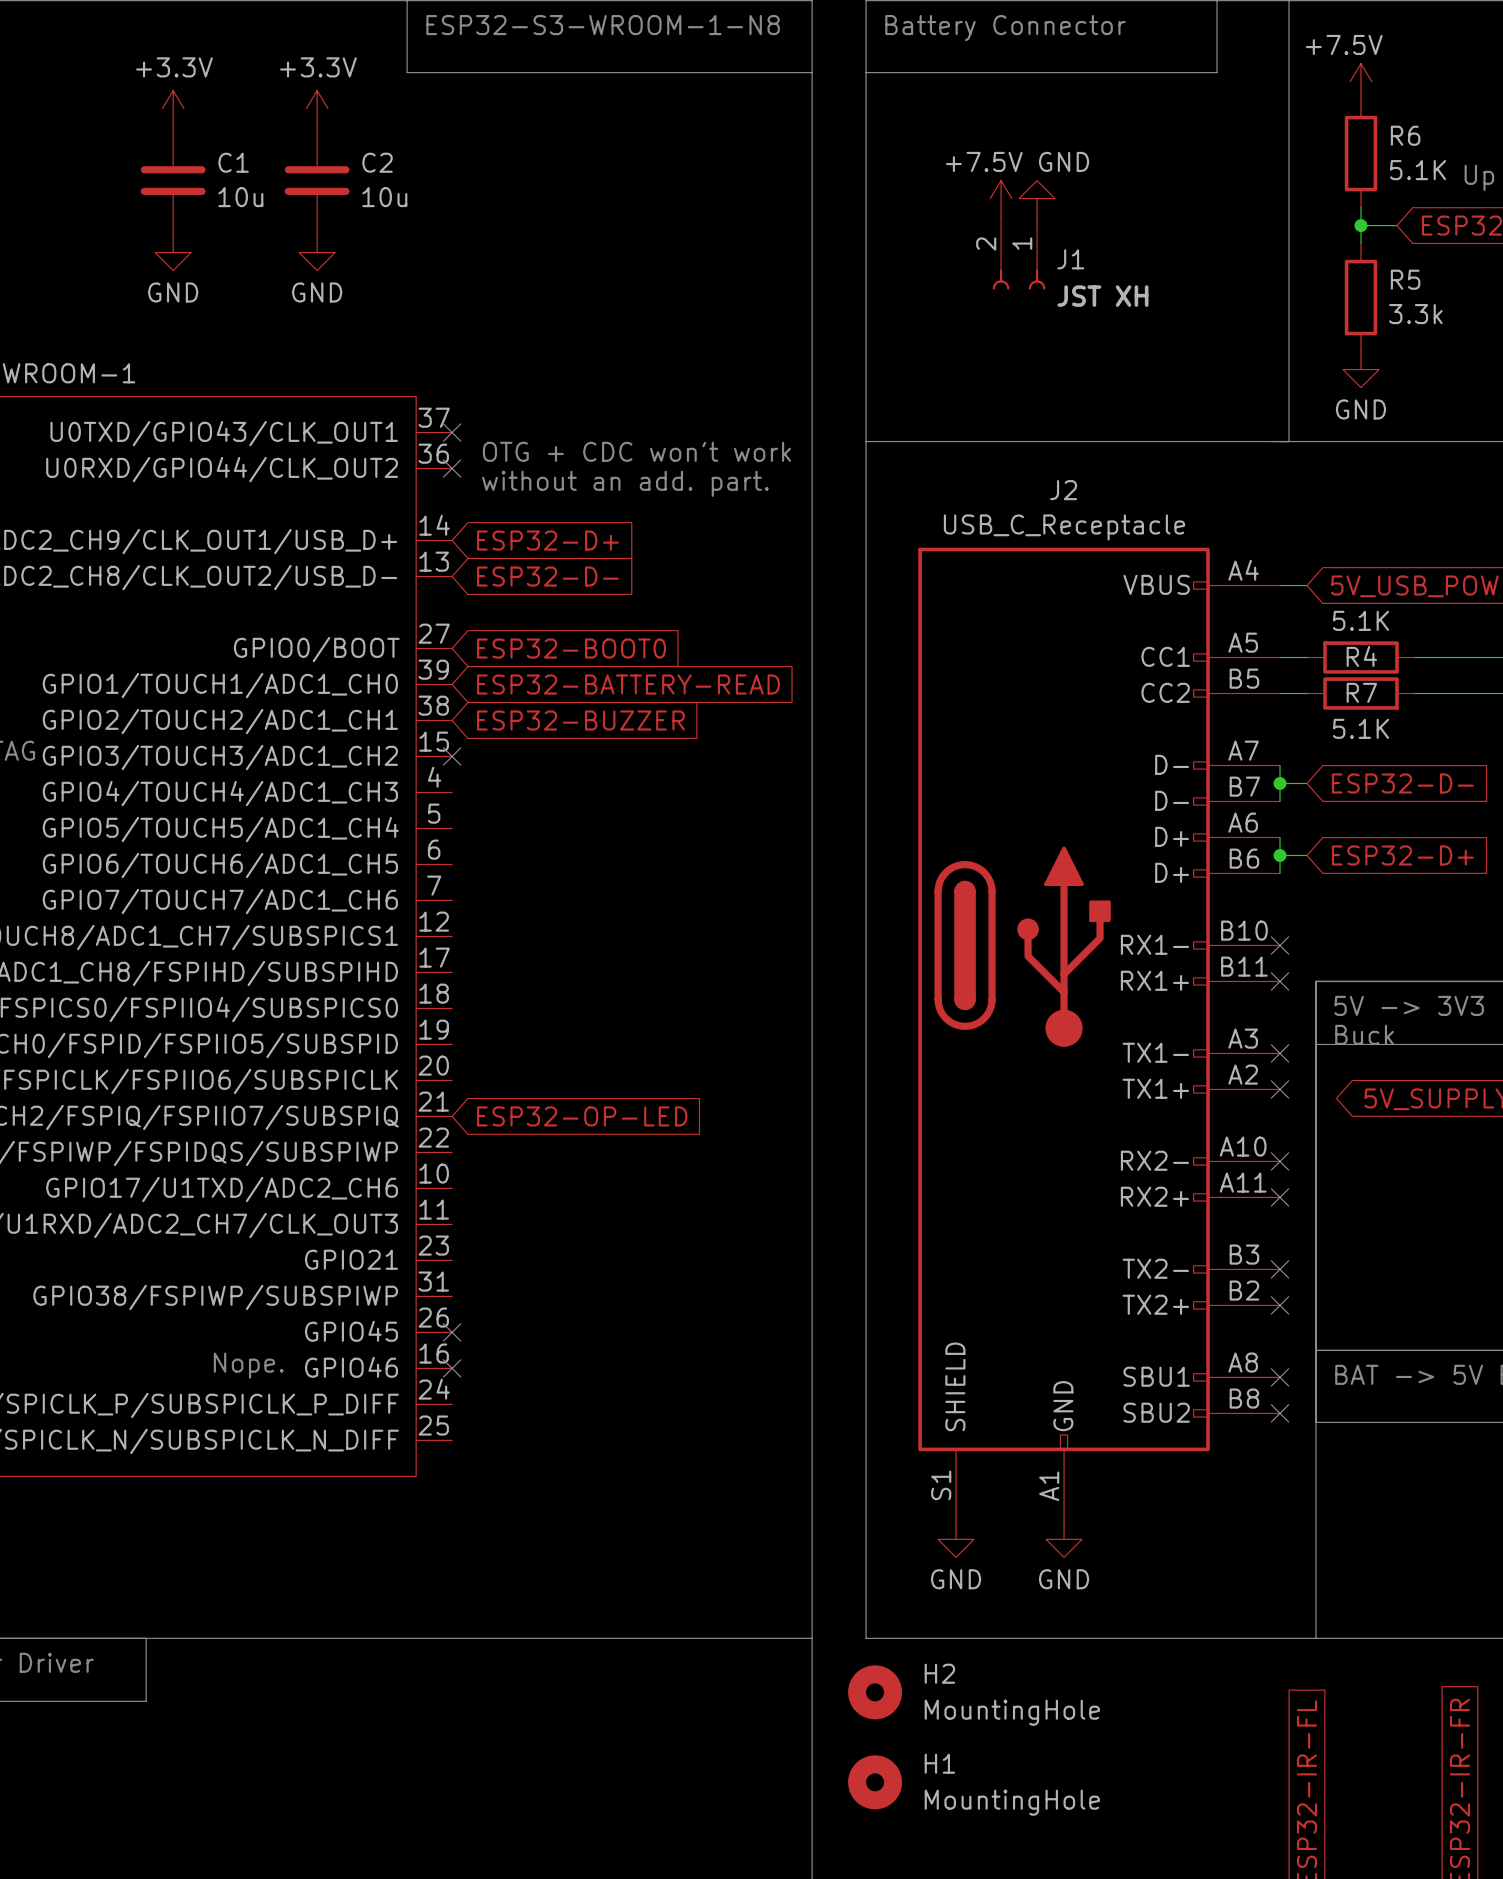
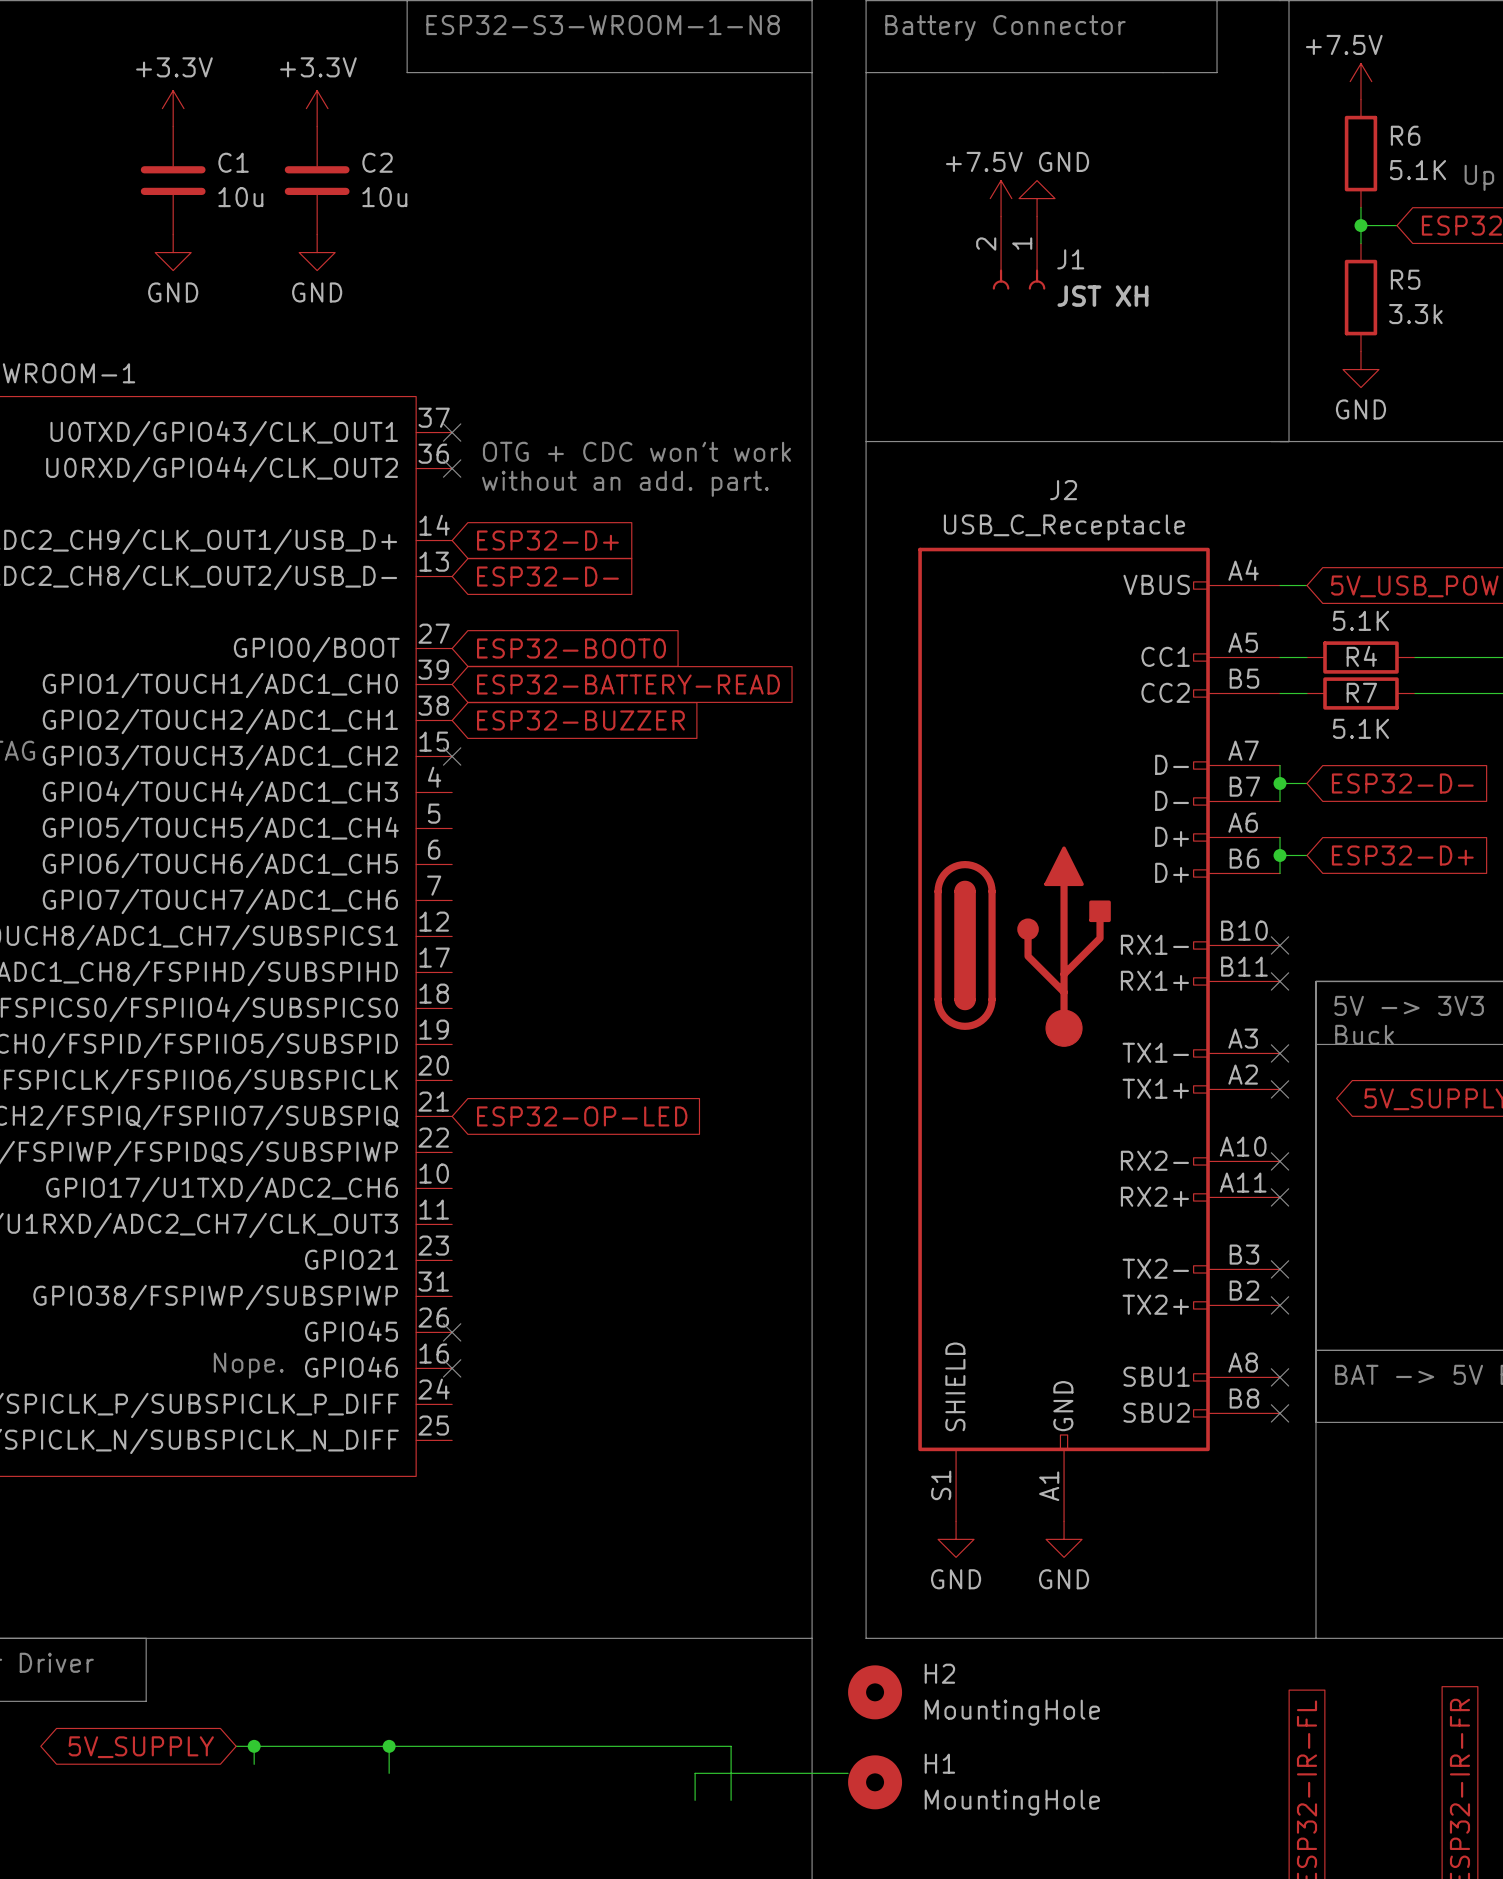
wire: none -> (236, 1746) (731, 1746) (731, 1800)
wire: none -> (254, 1746) (254, 1764)
junction: none -> (254, 1746)
wire: none -> (389, 1746) (389, 1773)
junction: none -> (389, 1746)
global label: none -> 5V_SUPPLY (141, 1747)
wire: none -> (848, 1773) (695, 1773) (695, 1800)

